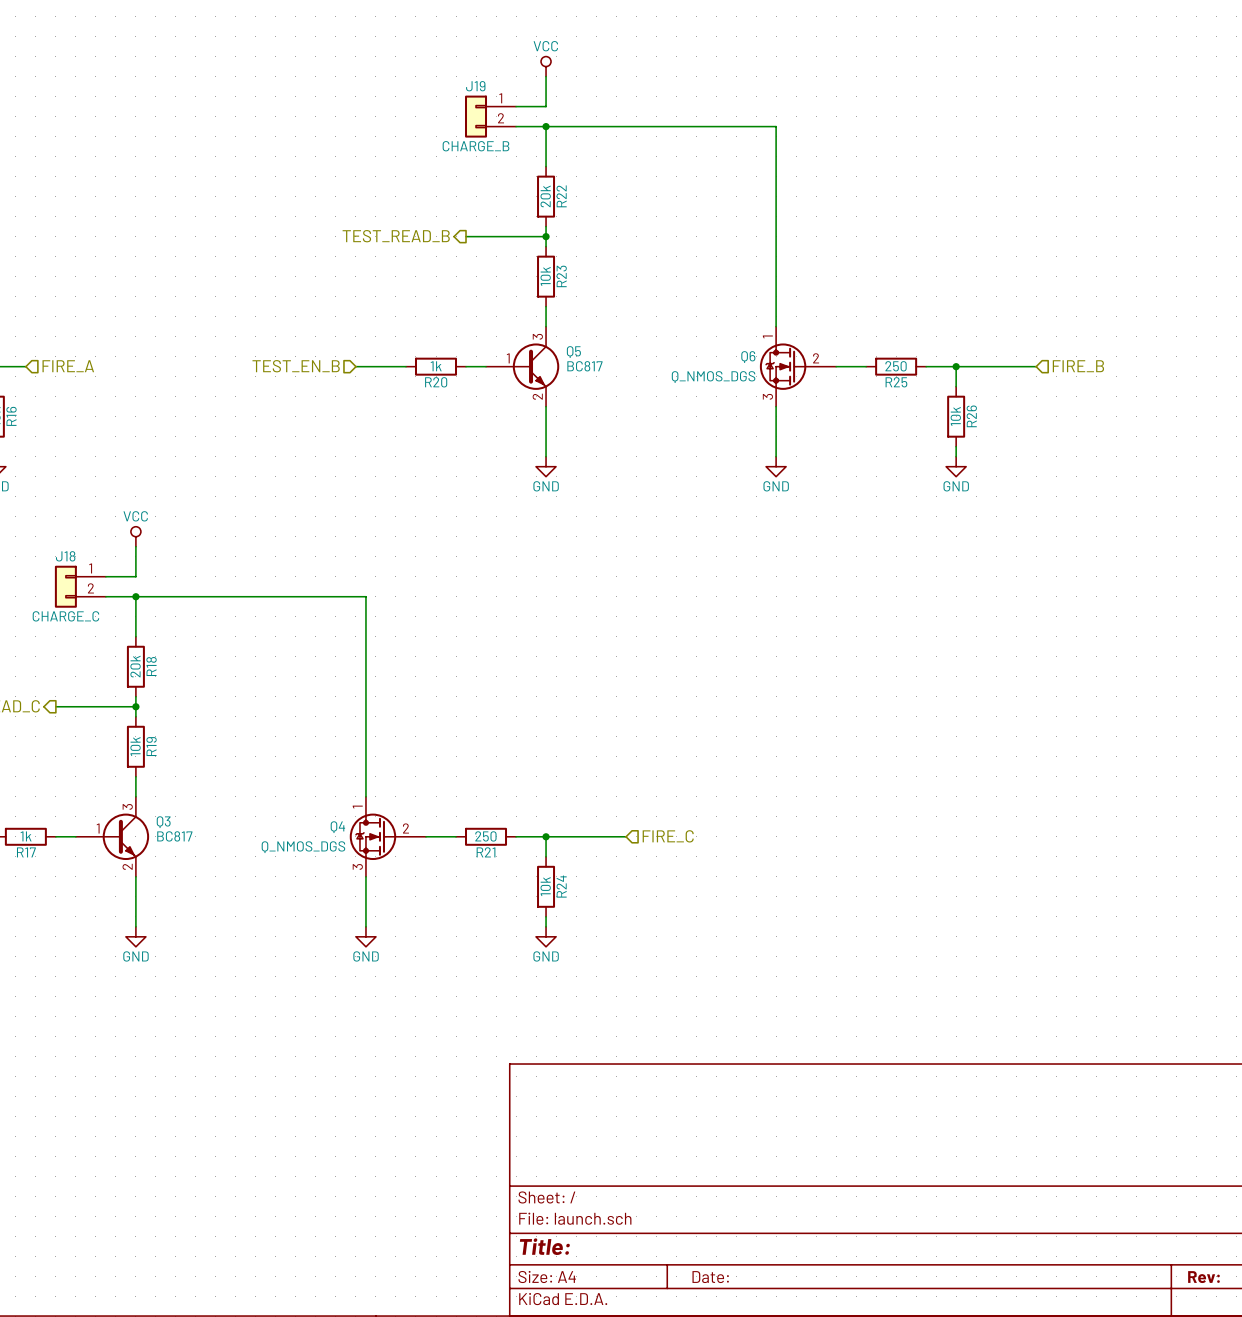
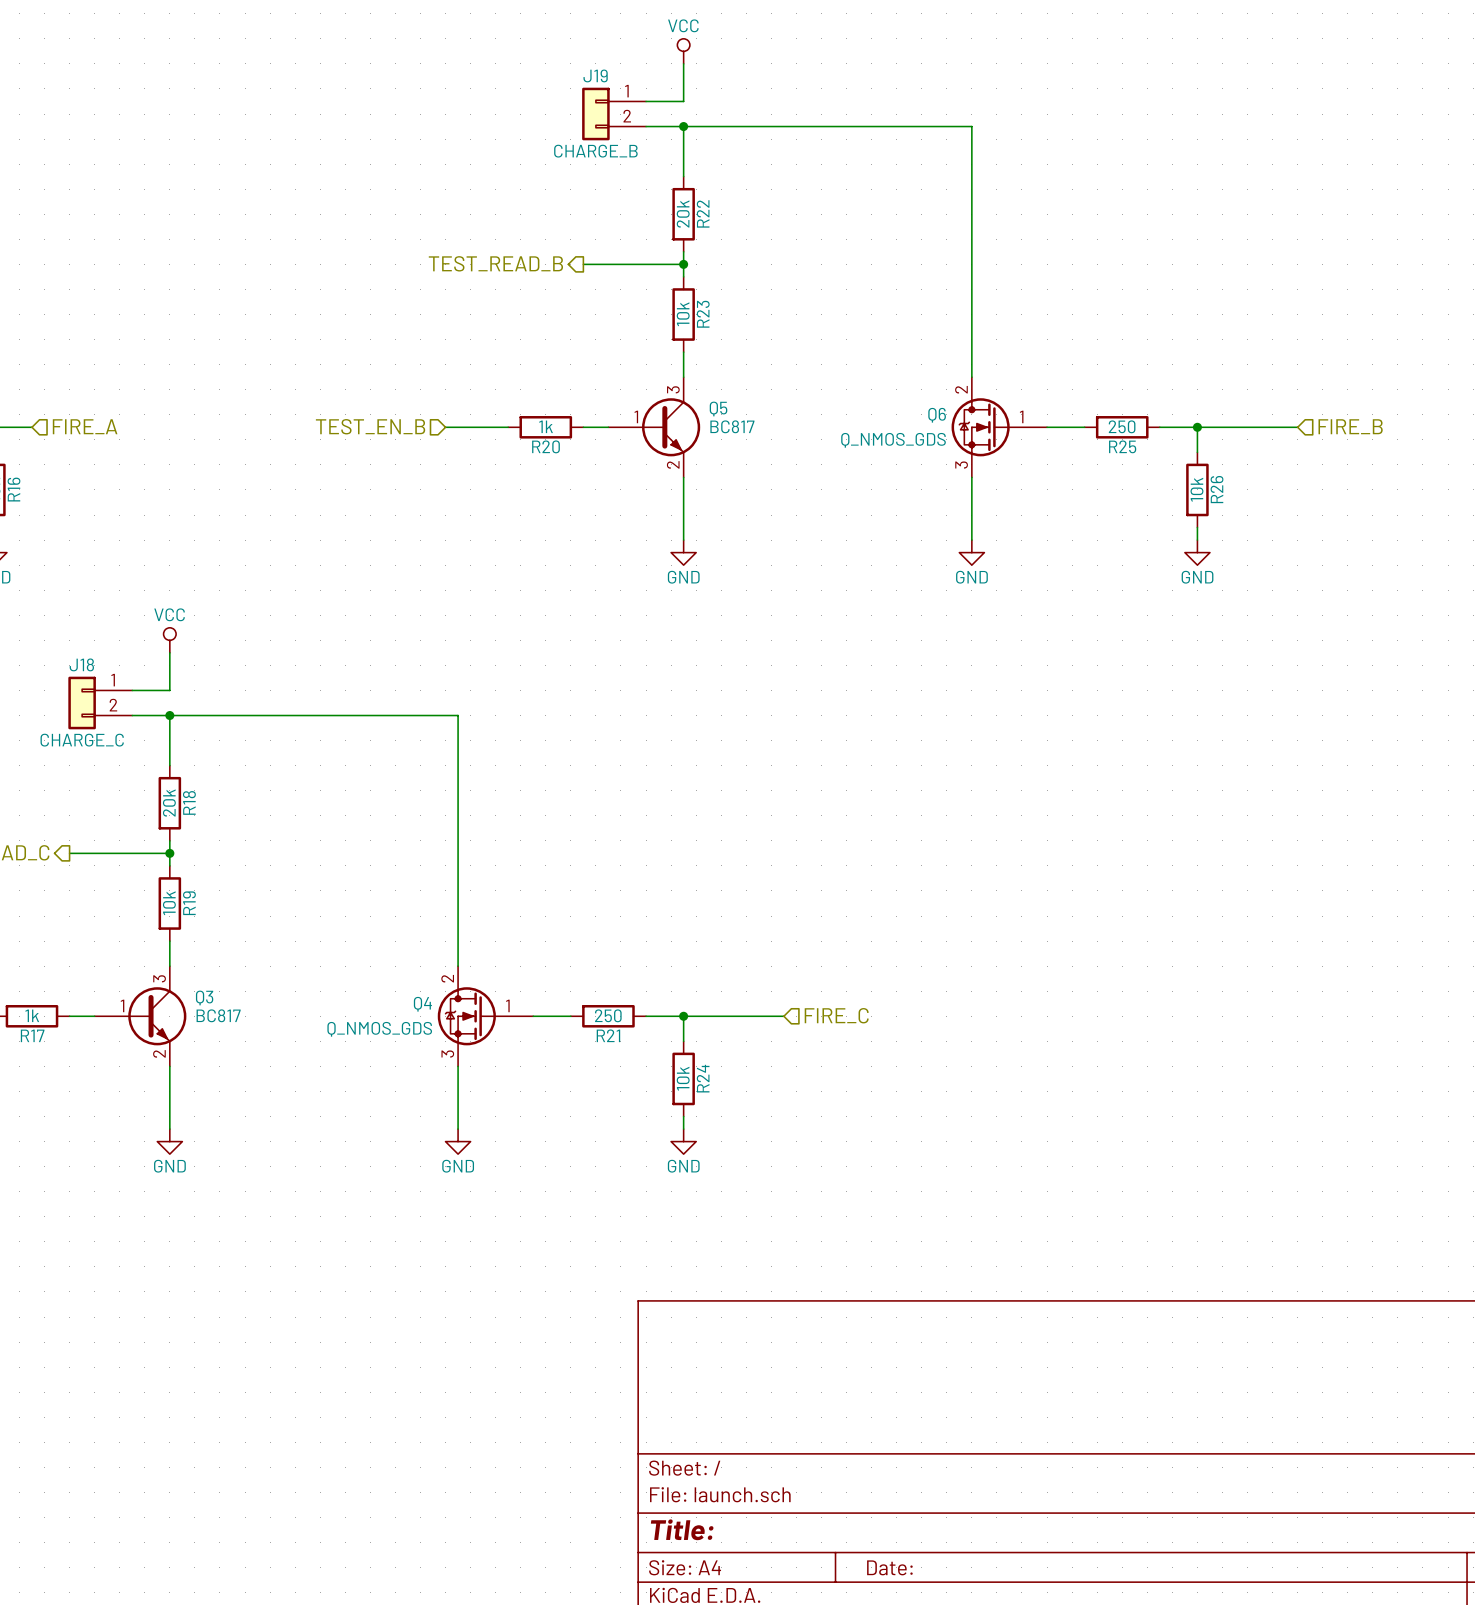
Q6 pin number: 1 (767, 336) -> 2 (961, 389)
Q6 pin number: 2 (816, 358) -> 1 (1021, 416)
Q6 value: Q_NMOS_DGS (713, 377) -> Q_NMOS_GDS (893, 440)
Q4 pin number: 1 (357, 807) -> 2 (447, 978)
Q4 pin number: 2 (405, 828) -> 1 (507, 1005)
Q4 value: Q_NMOS_DGS (303, 847) -> Q_NMOS_GDS (379, 1029)

